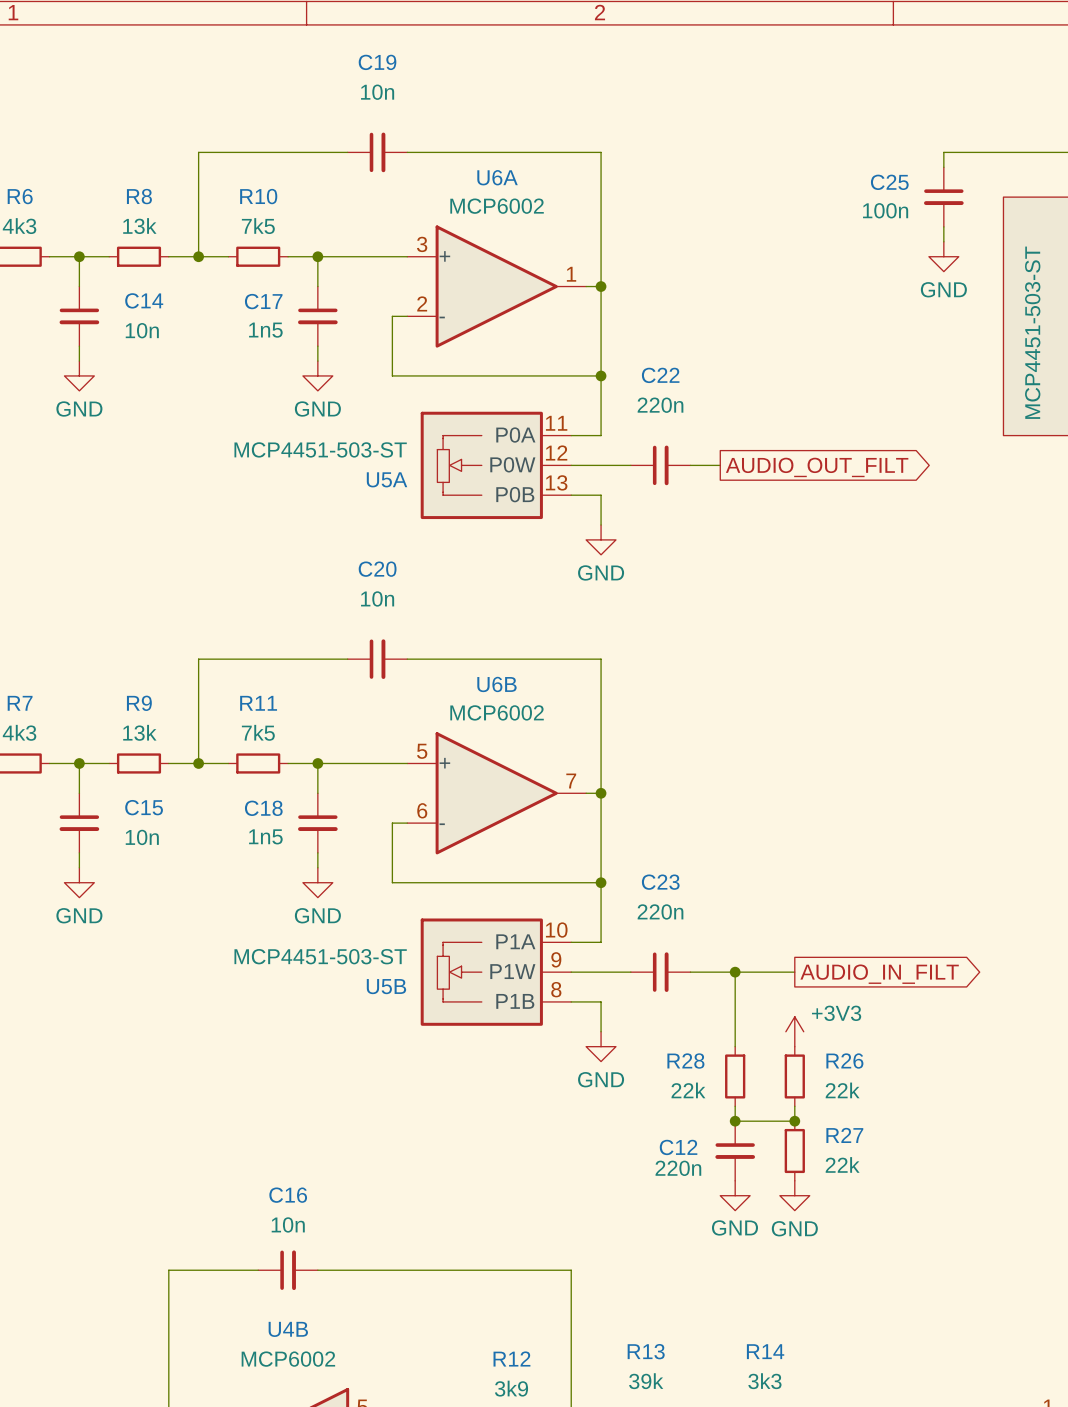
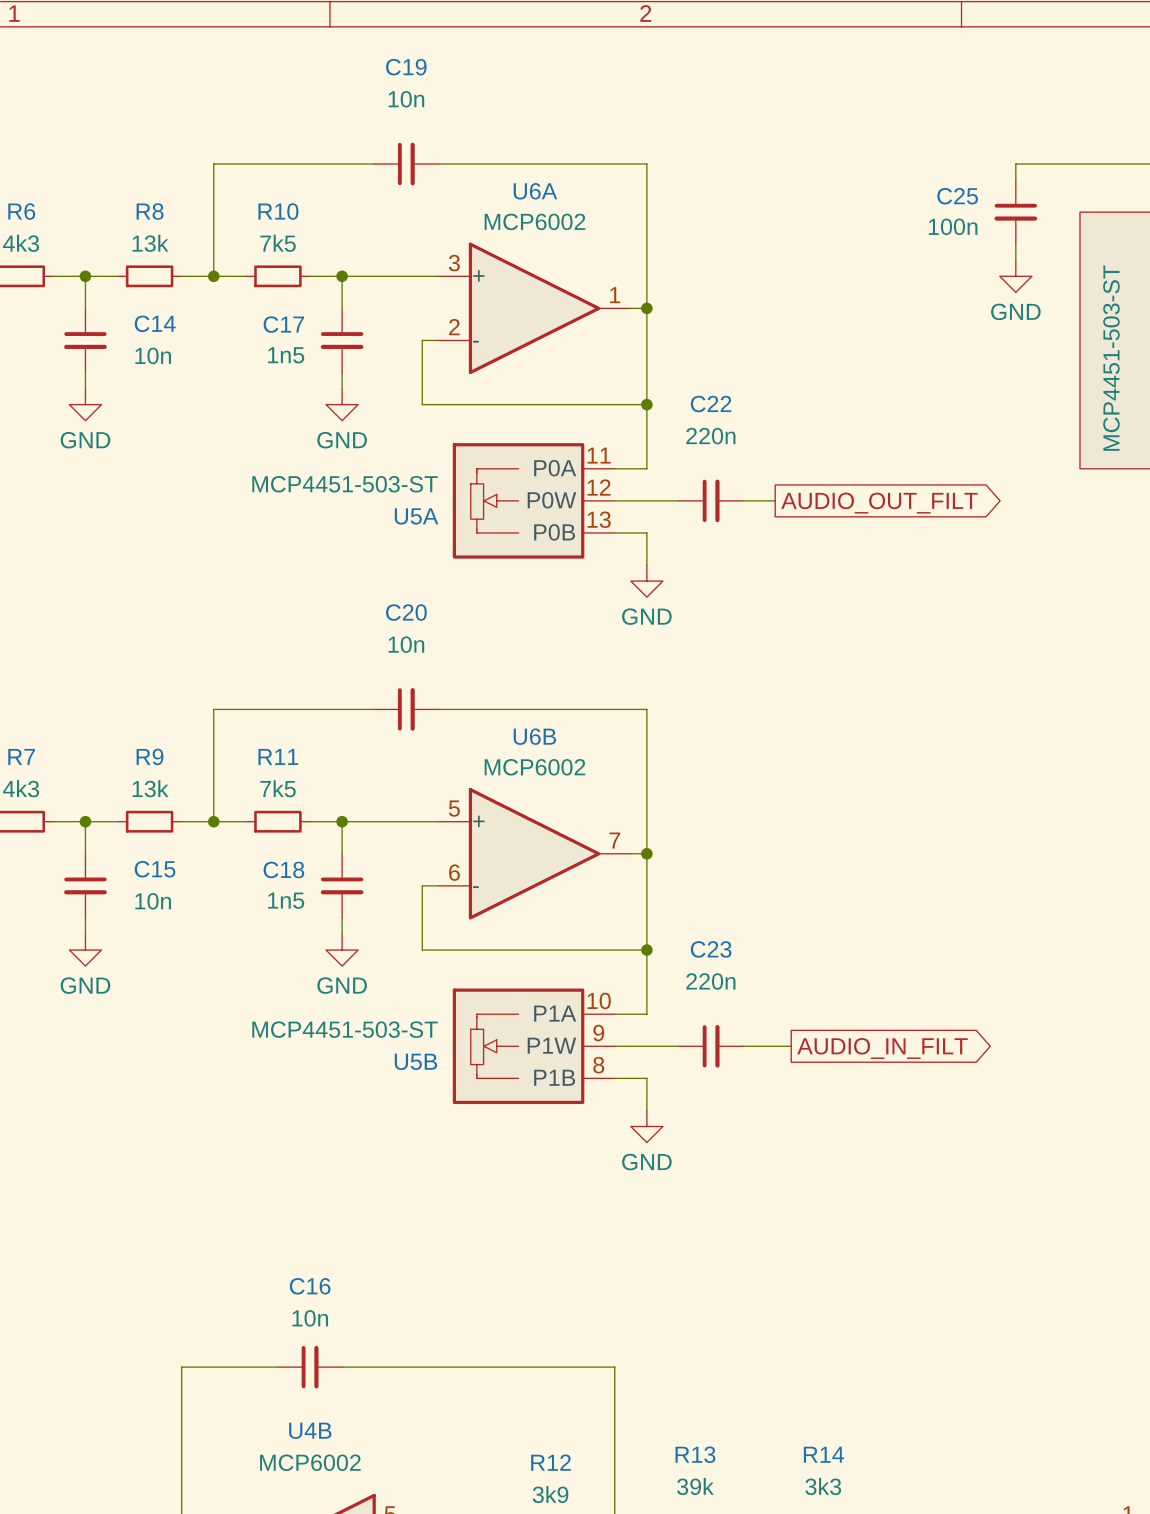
junction: (735, 972) -> none
wire: (794, 972) (735, 972) (735, 1046) -> none
global label position: AUDIO_IN_FILT (879, 974) -> AUDIO_IN_FILT (882, 1048)
power symbol: +3V3 (794, 1031) -> none
R28: 22k (735, 1076) -> none
R26: 22k (794, 1076) -> none
wire: (735, 1106) (735, 1121) (794, 1121) (794, 1106) -> none
junction: (735, 1121) -> none
junction: (794, 1121) -> none
C12: 220n (735, 1151) -> none
R27: 22k (794, 1151) -> none
power symbol: GND (735, 1195) -> none
power symbol: GND (794, 1195) -> none

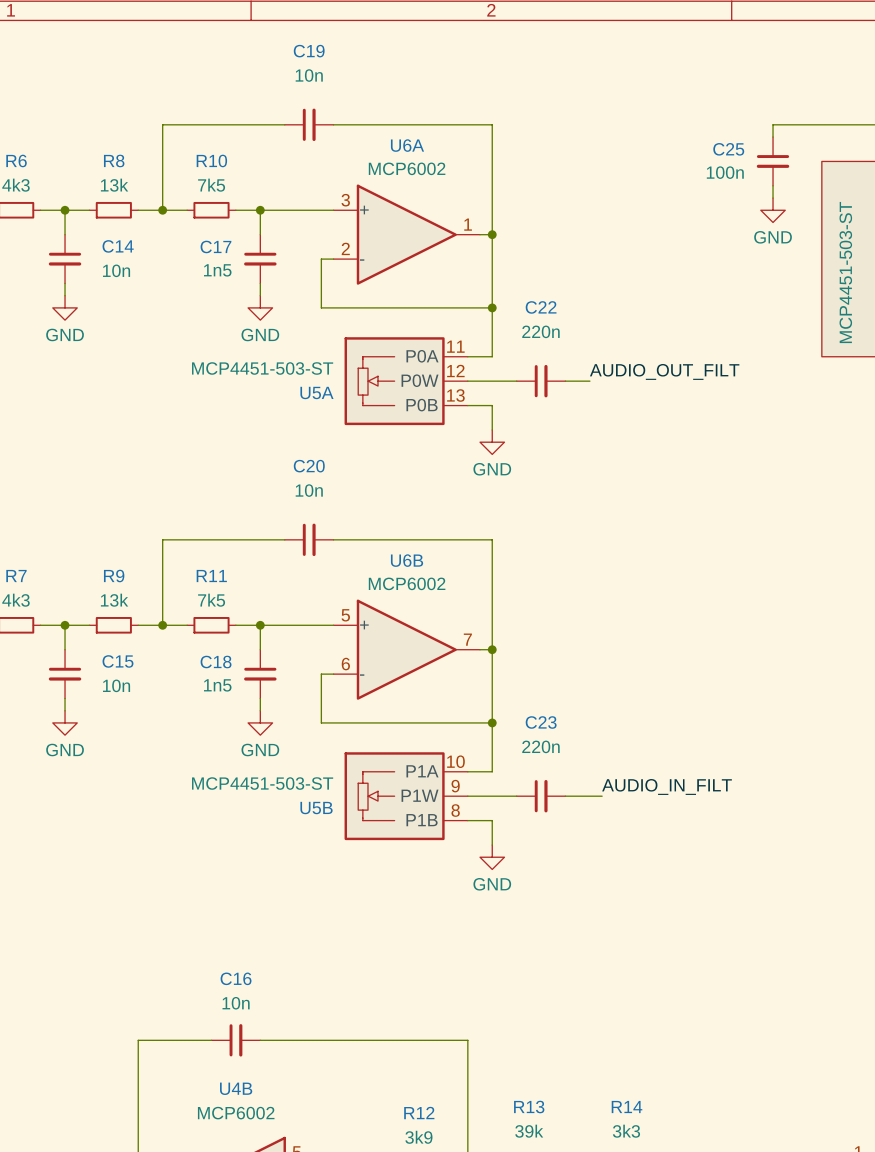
label: none -> AUDIO_OUT_FILT (664, 371)
global label: AUDIO_OUT_FILT (879, 503) -> none
label: none -> AUDIO_IN_FILT (667, 786)
global label: AUDIO_IN_FILT (882, 1048) -> none

